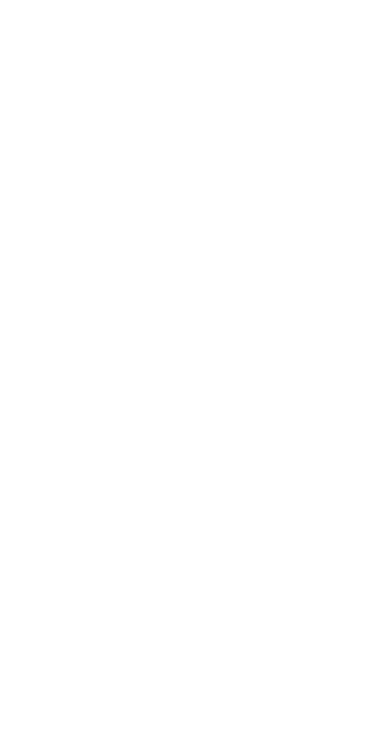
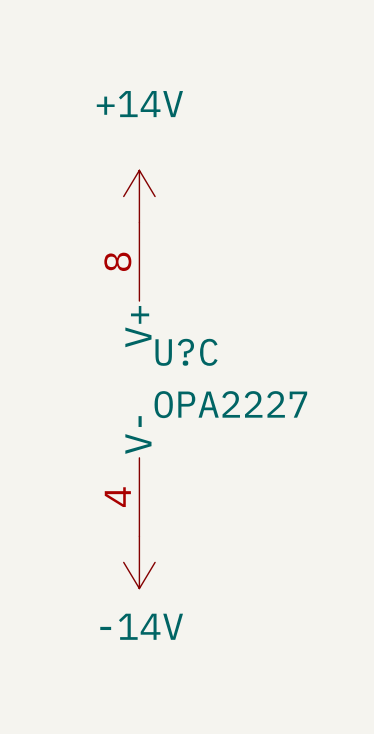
power symbol: none -> +14V (139, 196)
U?C: none -> OPA2227 (139, 379)
power symbol: none -> -14V (139, 562)

